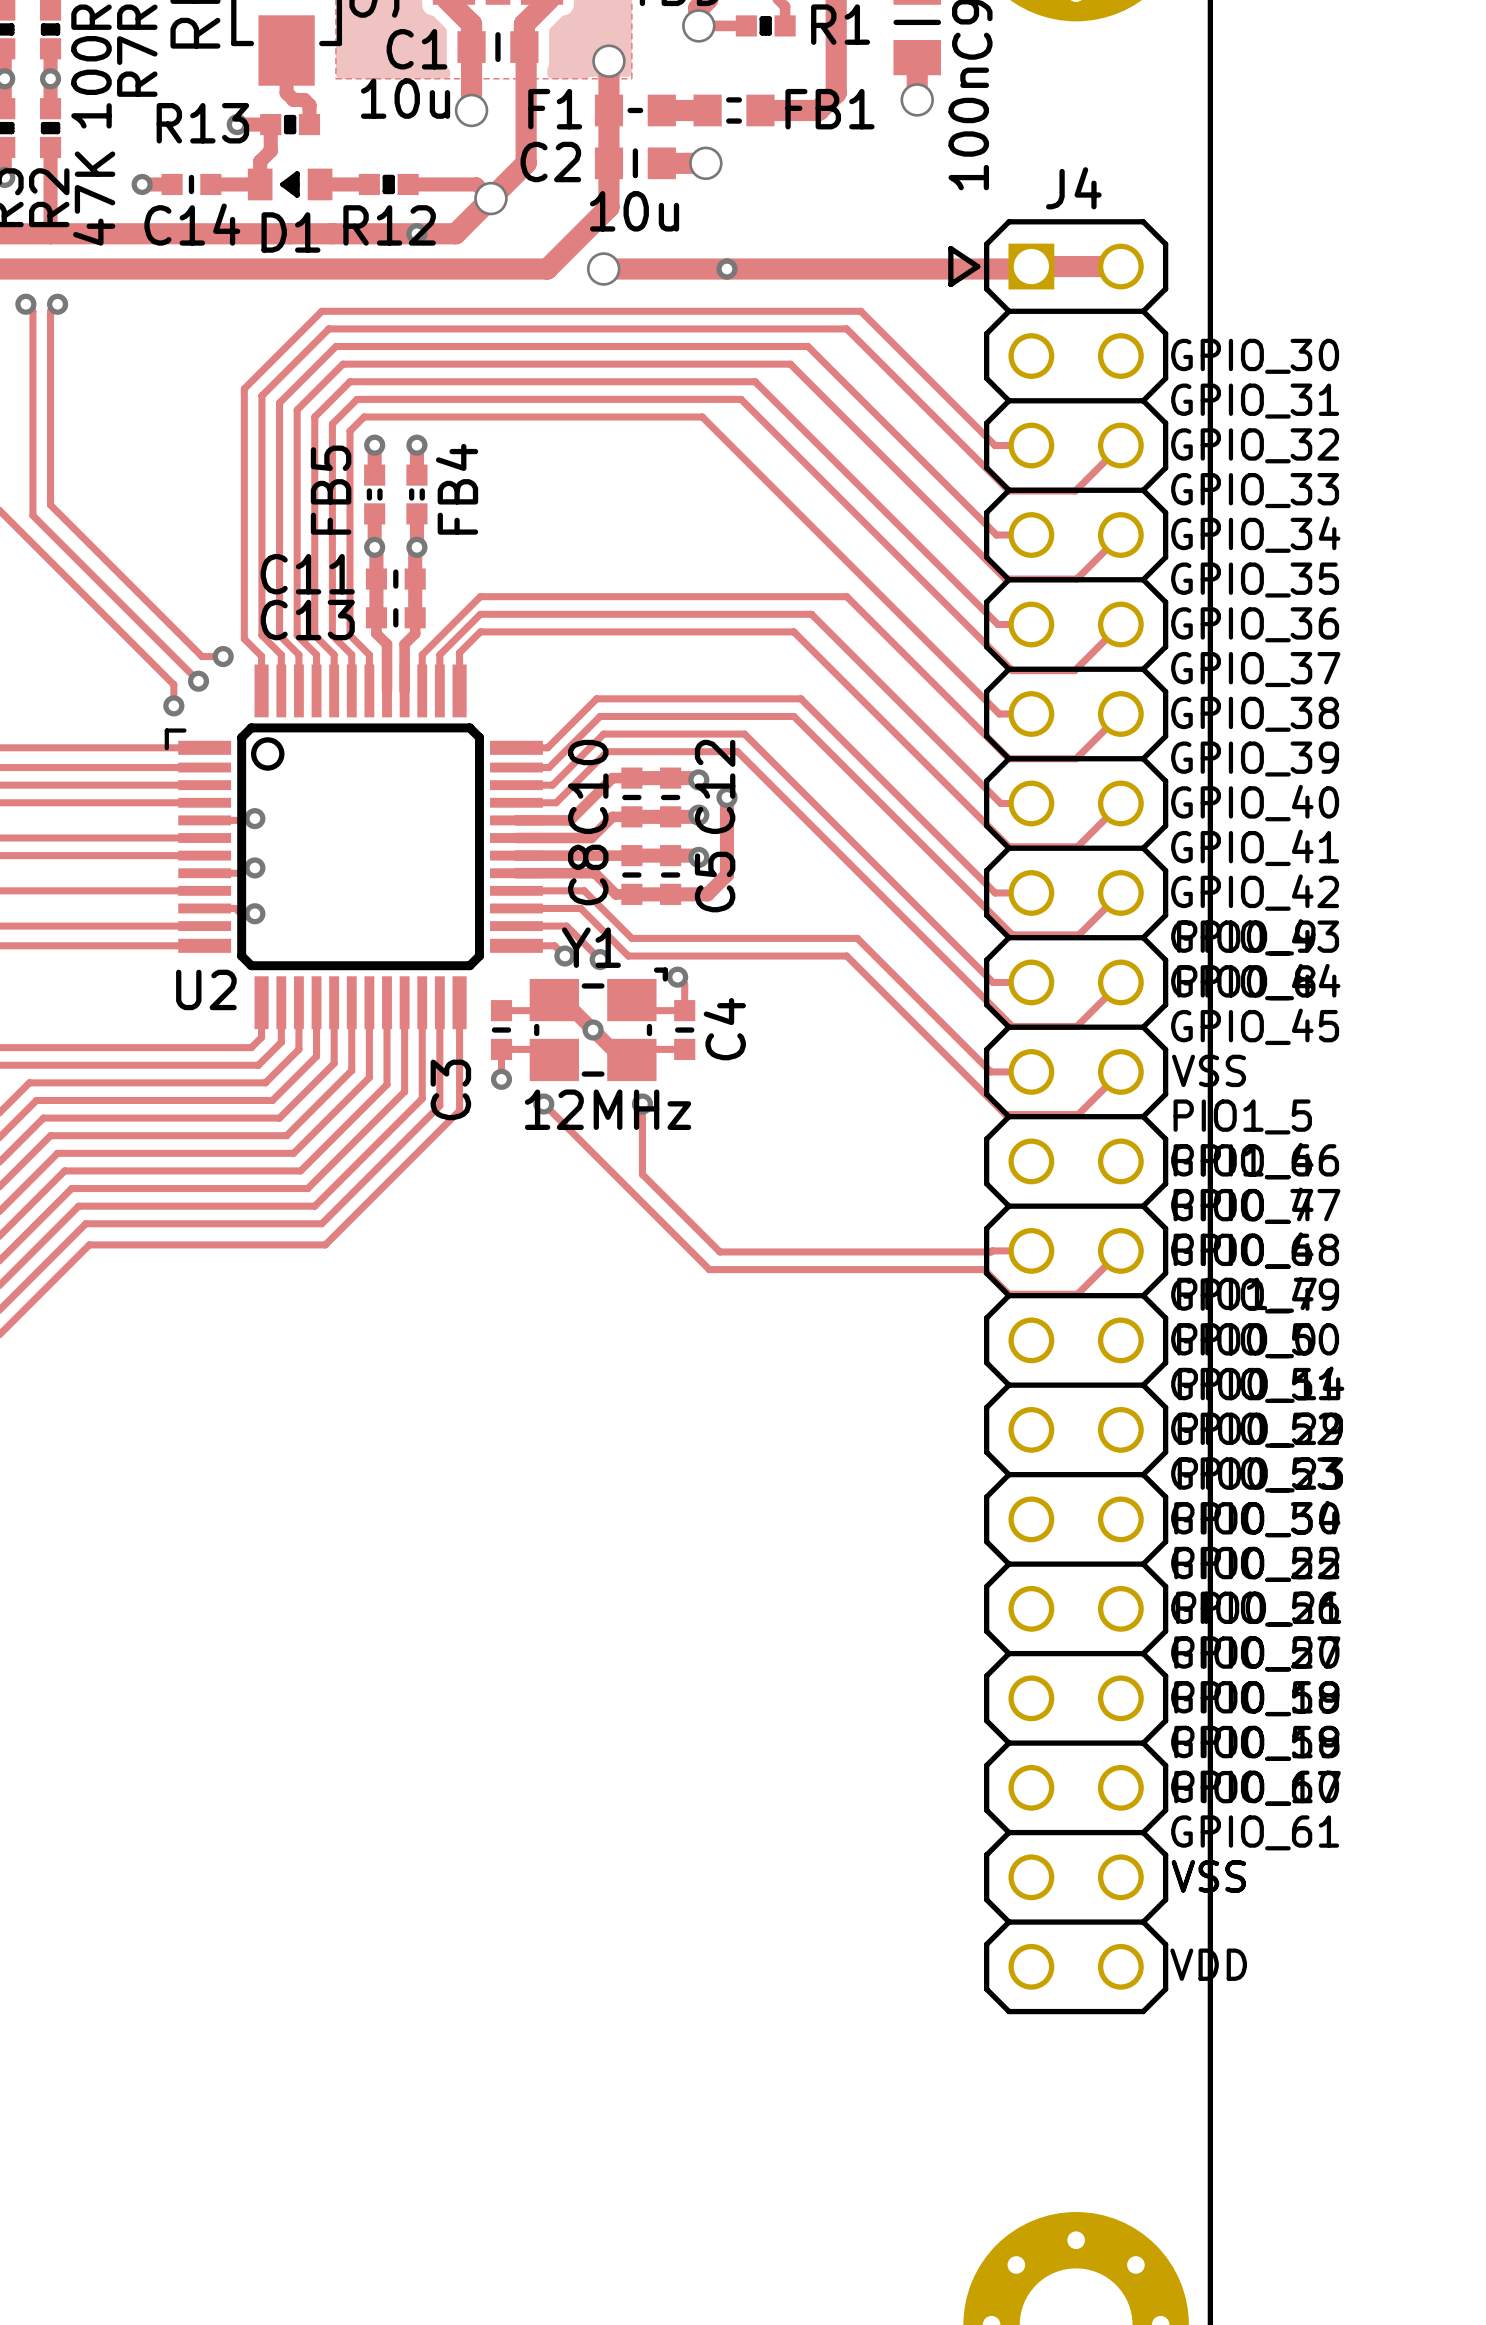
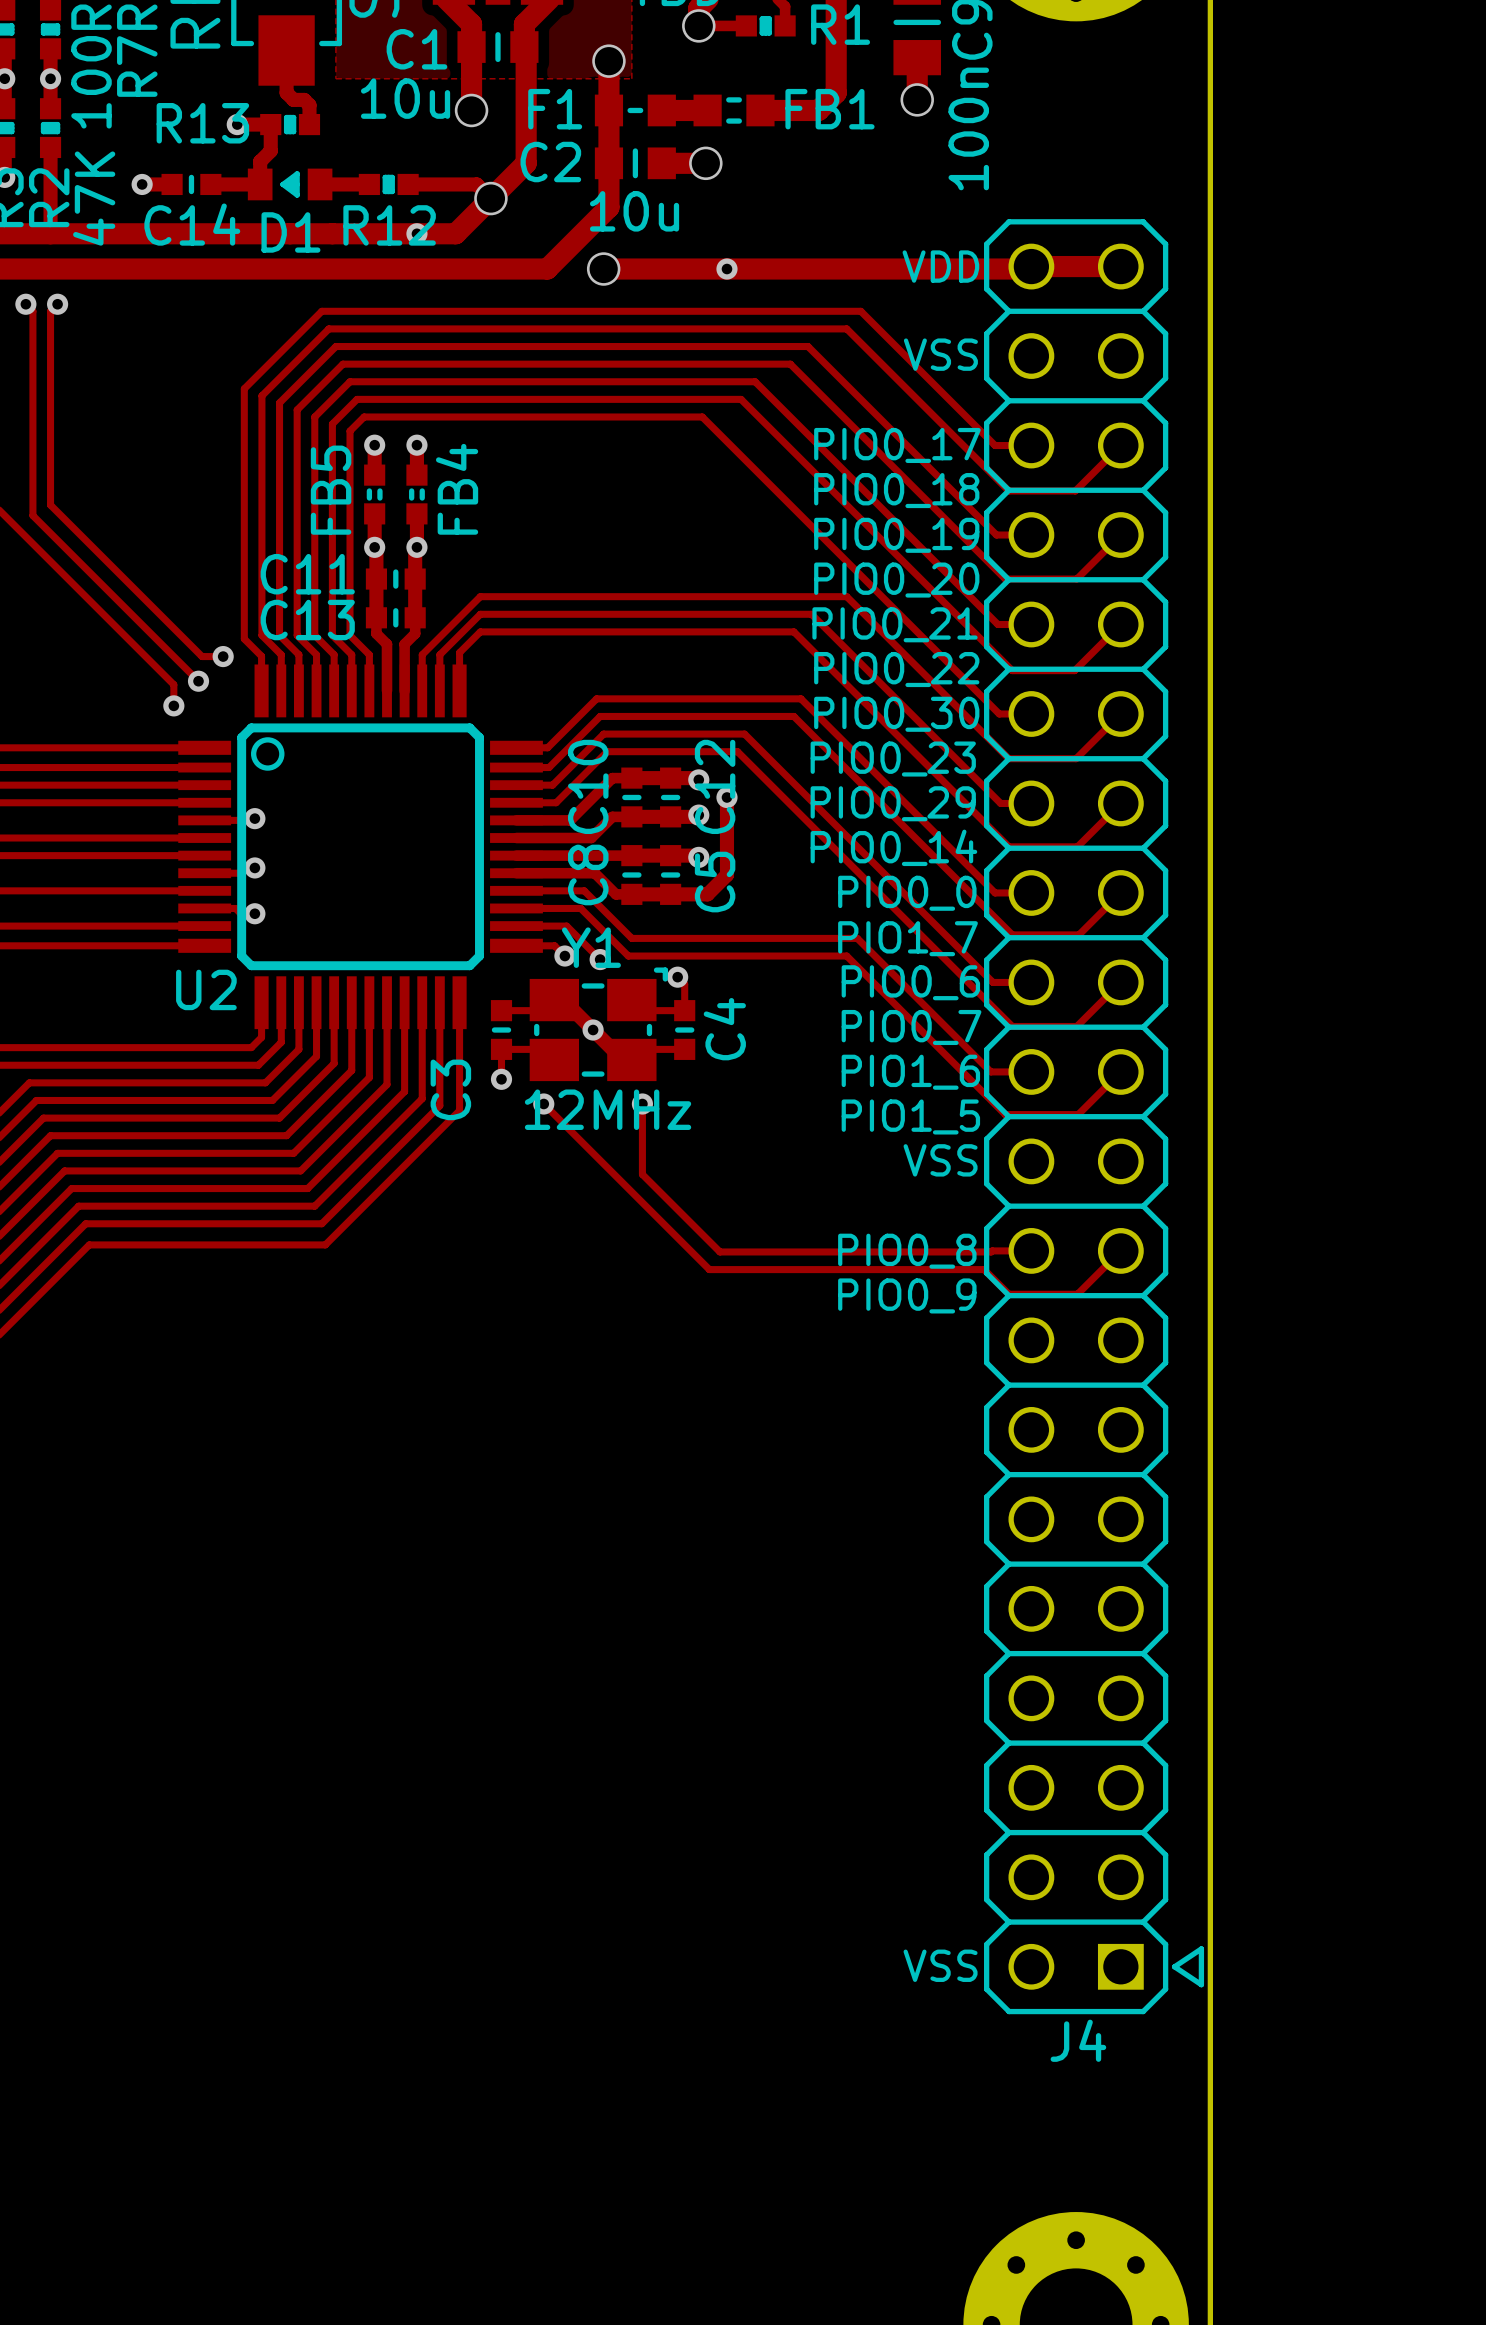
J4 name position: J4 (1073, 188) -> J4 (1078, 2040)
J4 footprint: [948, 219, 1169, 2015] -> [983, 219, 1205, 2015]
U2 footprint: [164, 664, 543, 1030] -> [178, 664, 543, 1030]

